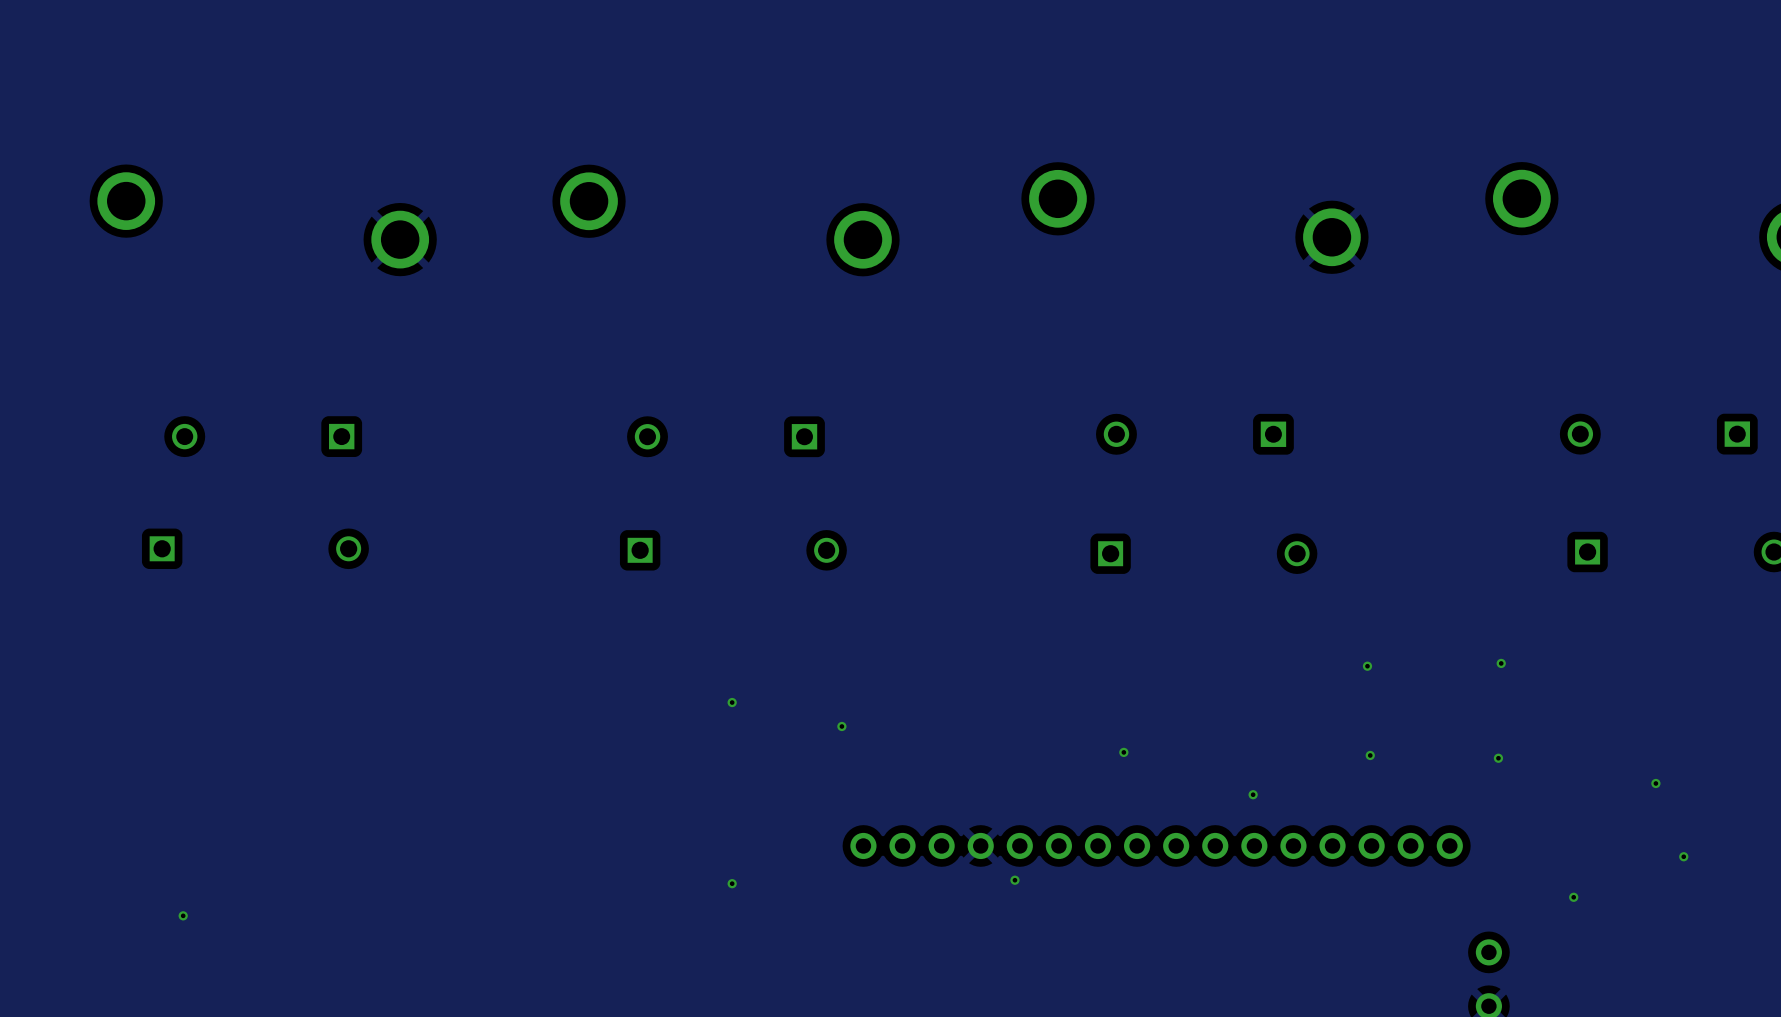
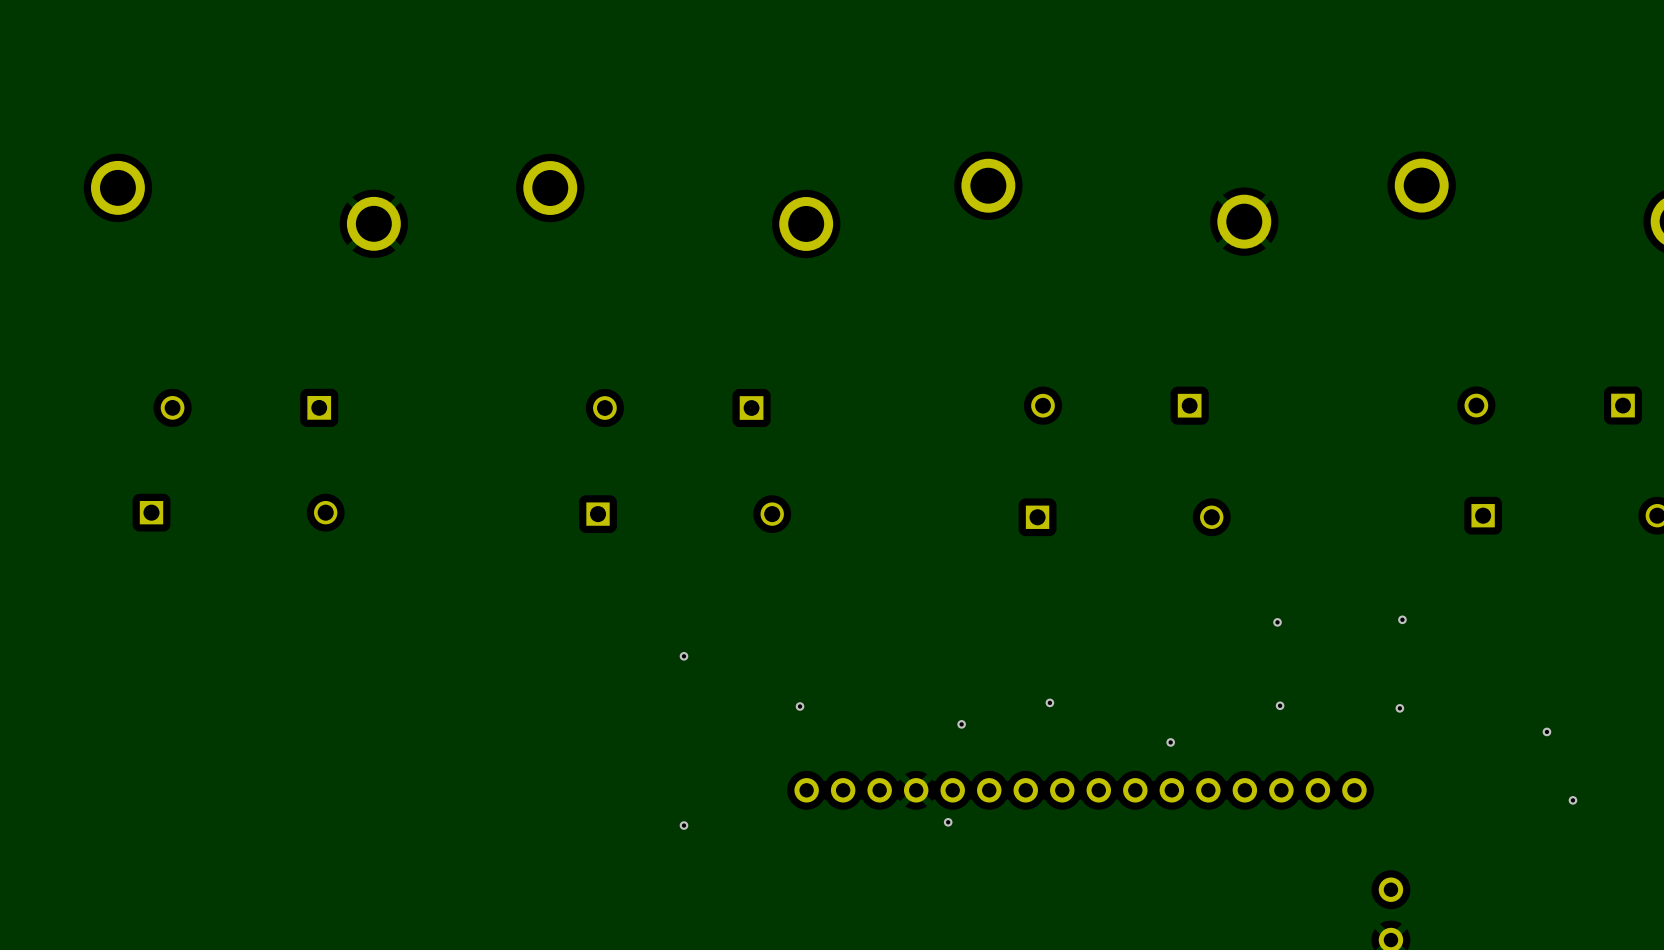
via position: (841, 726) -> (800, 706)
via: none -> (961, 724)
via: (1573, 897) -> none
via: (183, 915) -> none

